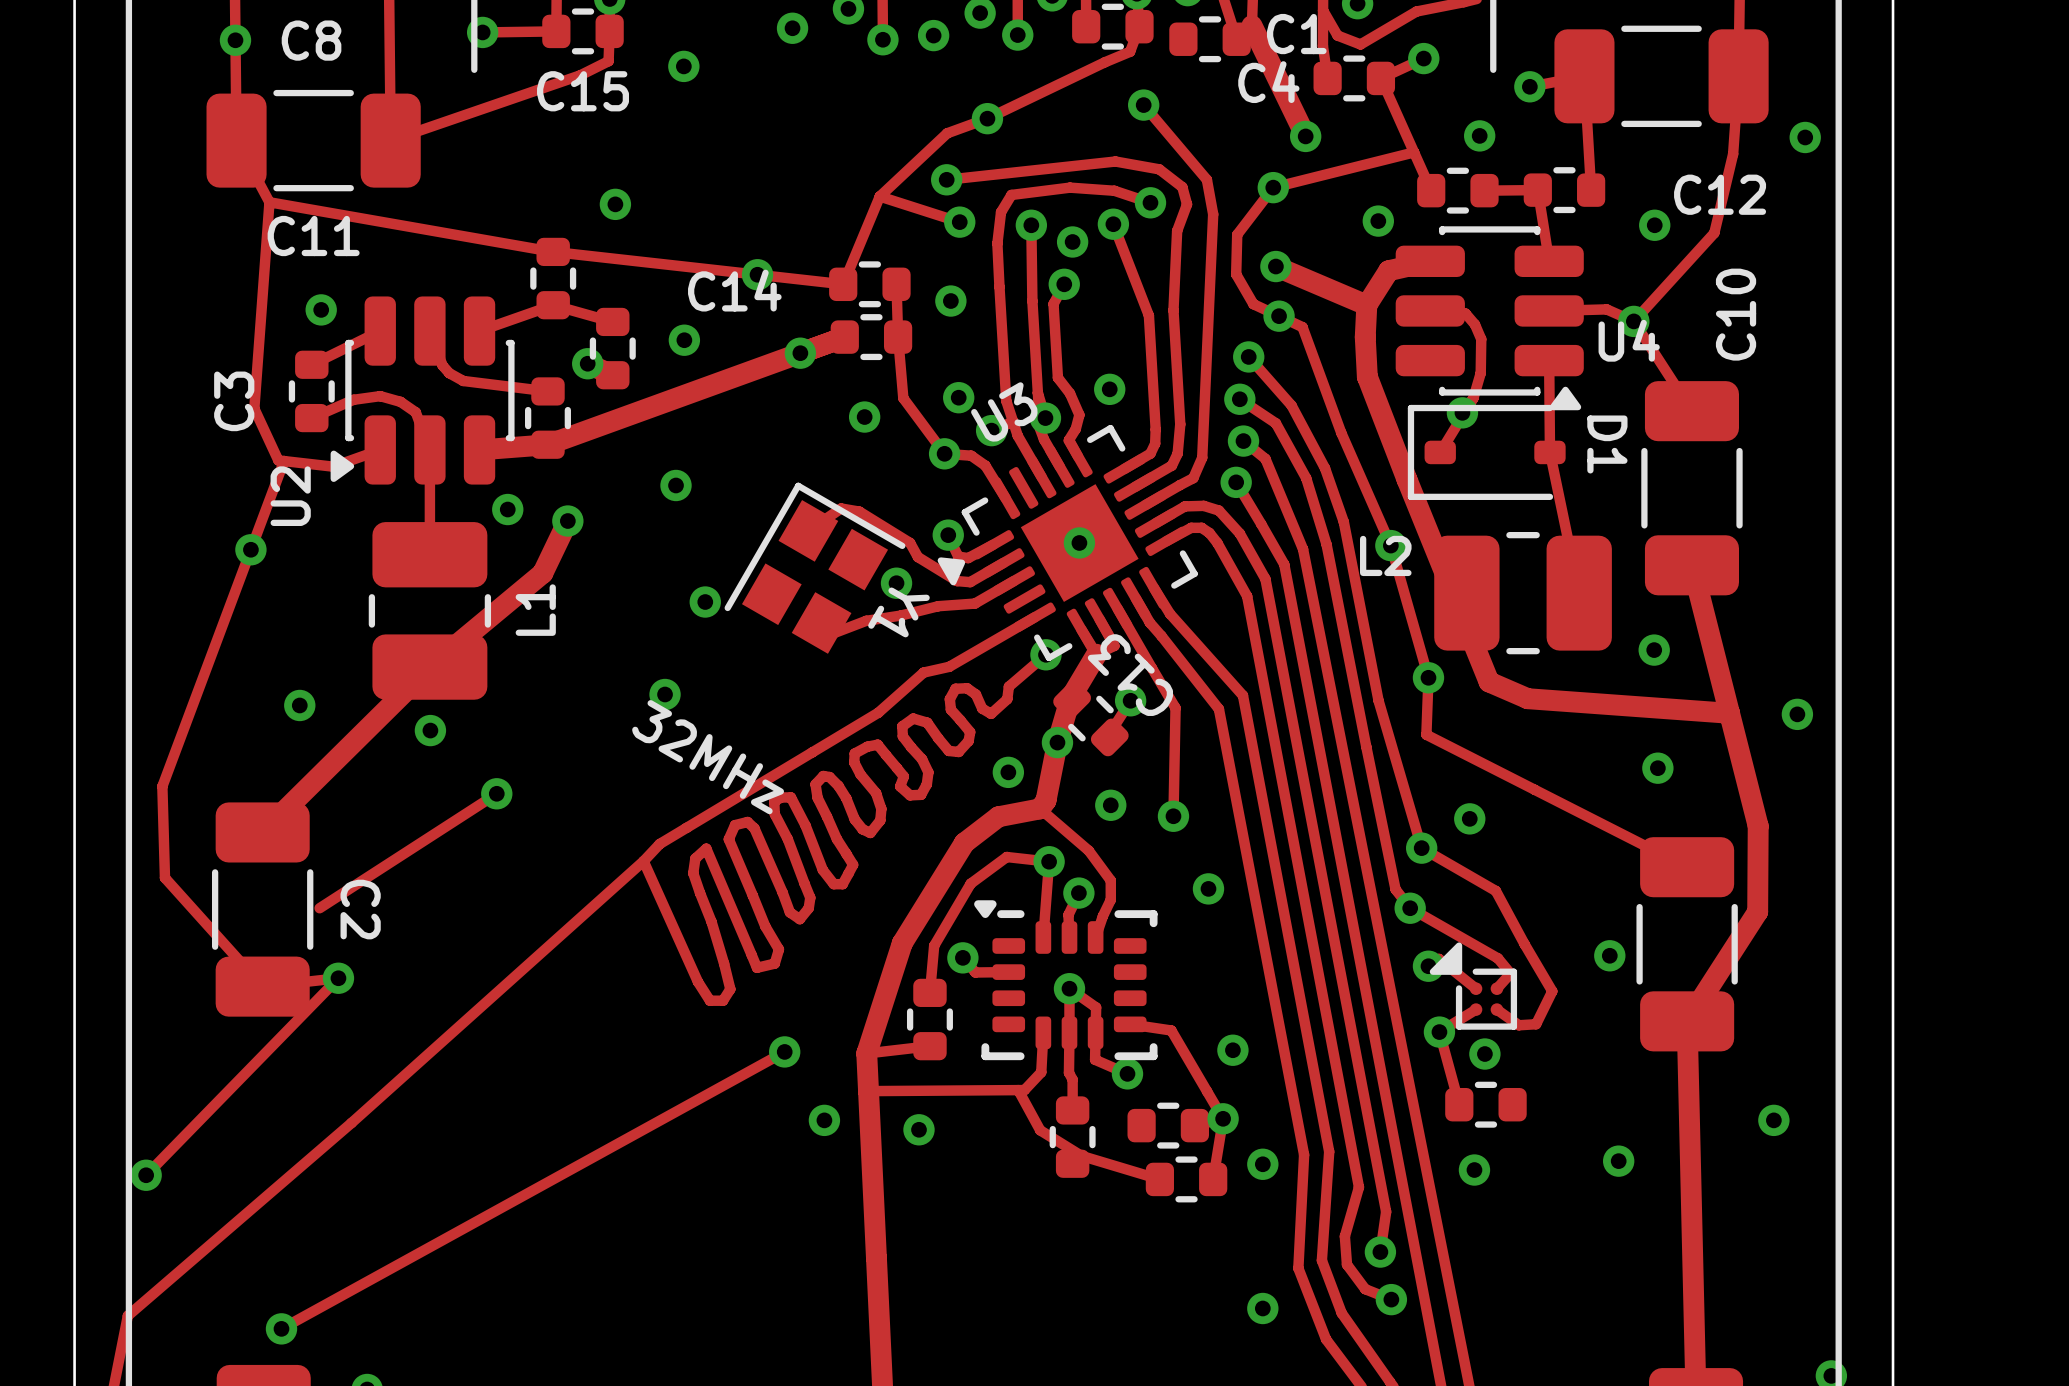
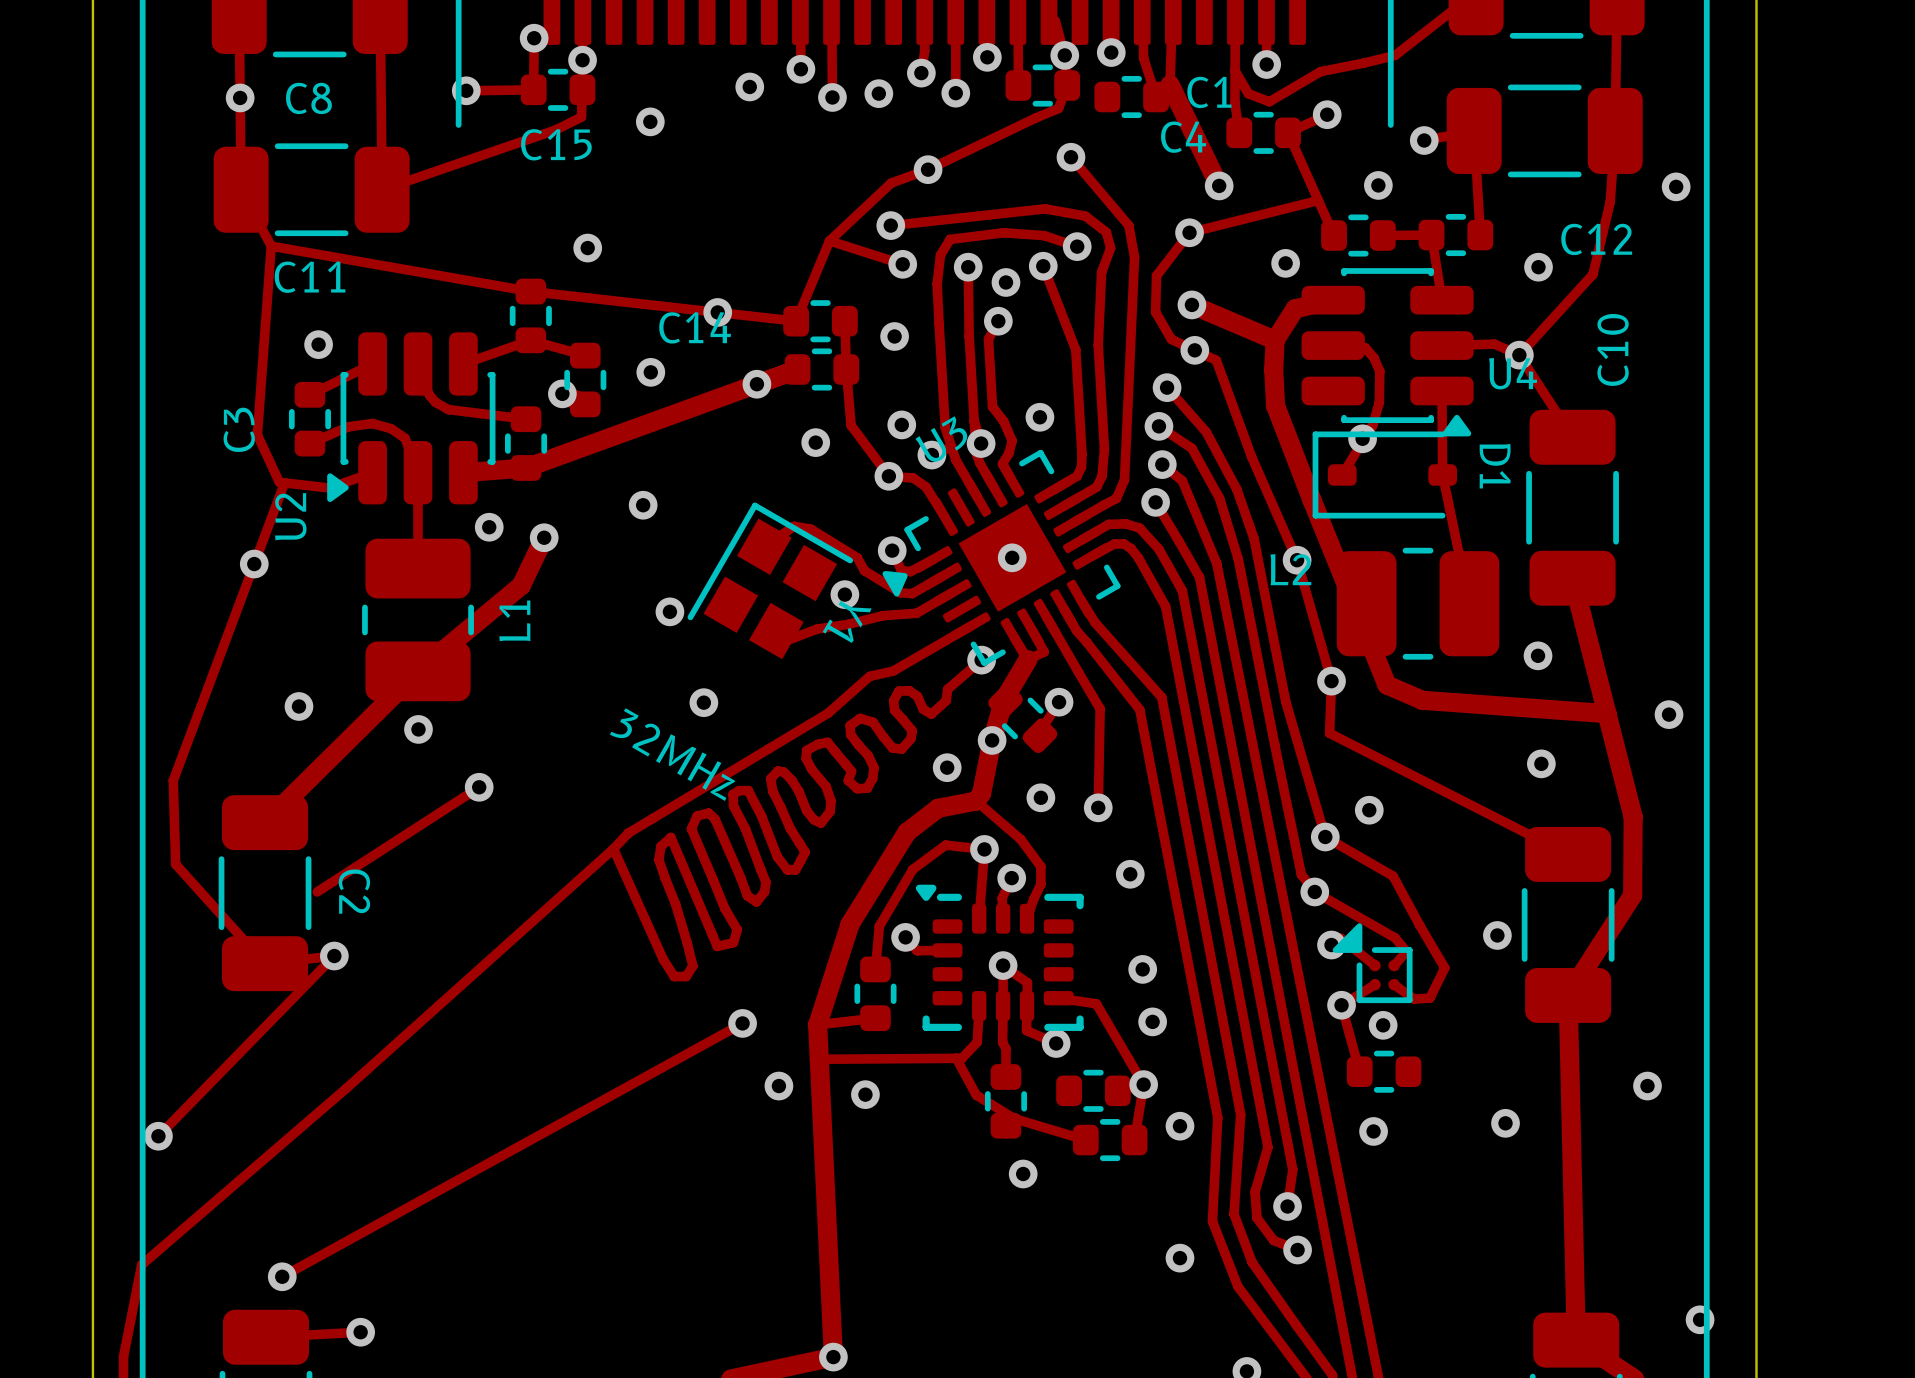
C13 name: C13 (1130, 675) -> none
via position: (665, 694) -> (703, 702)
via: none -> (1142, 969)
via: none -> (1023, 1174)

